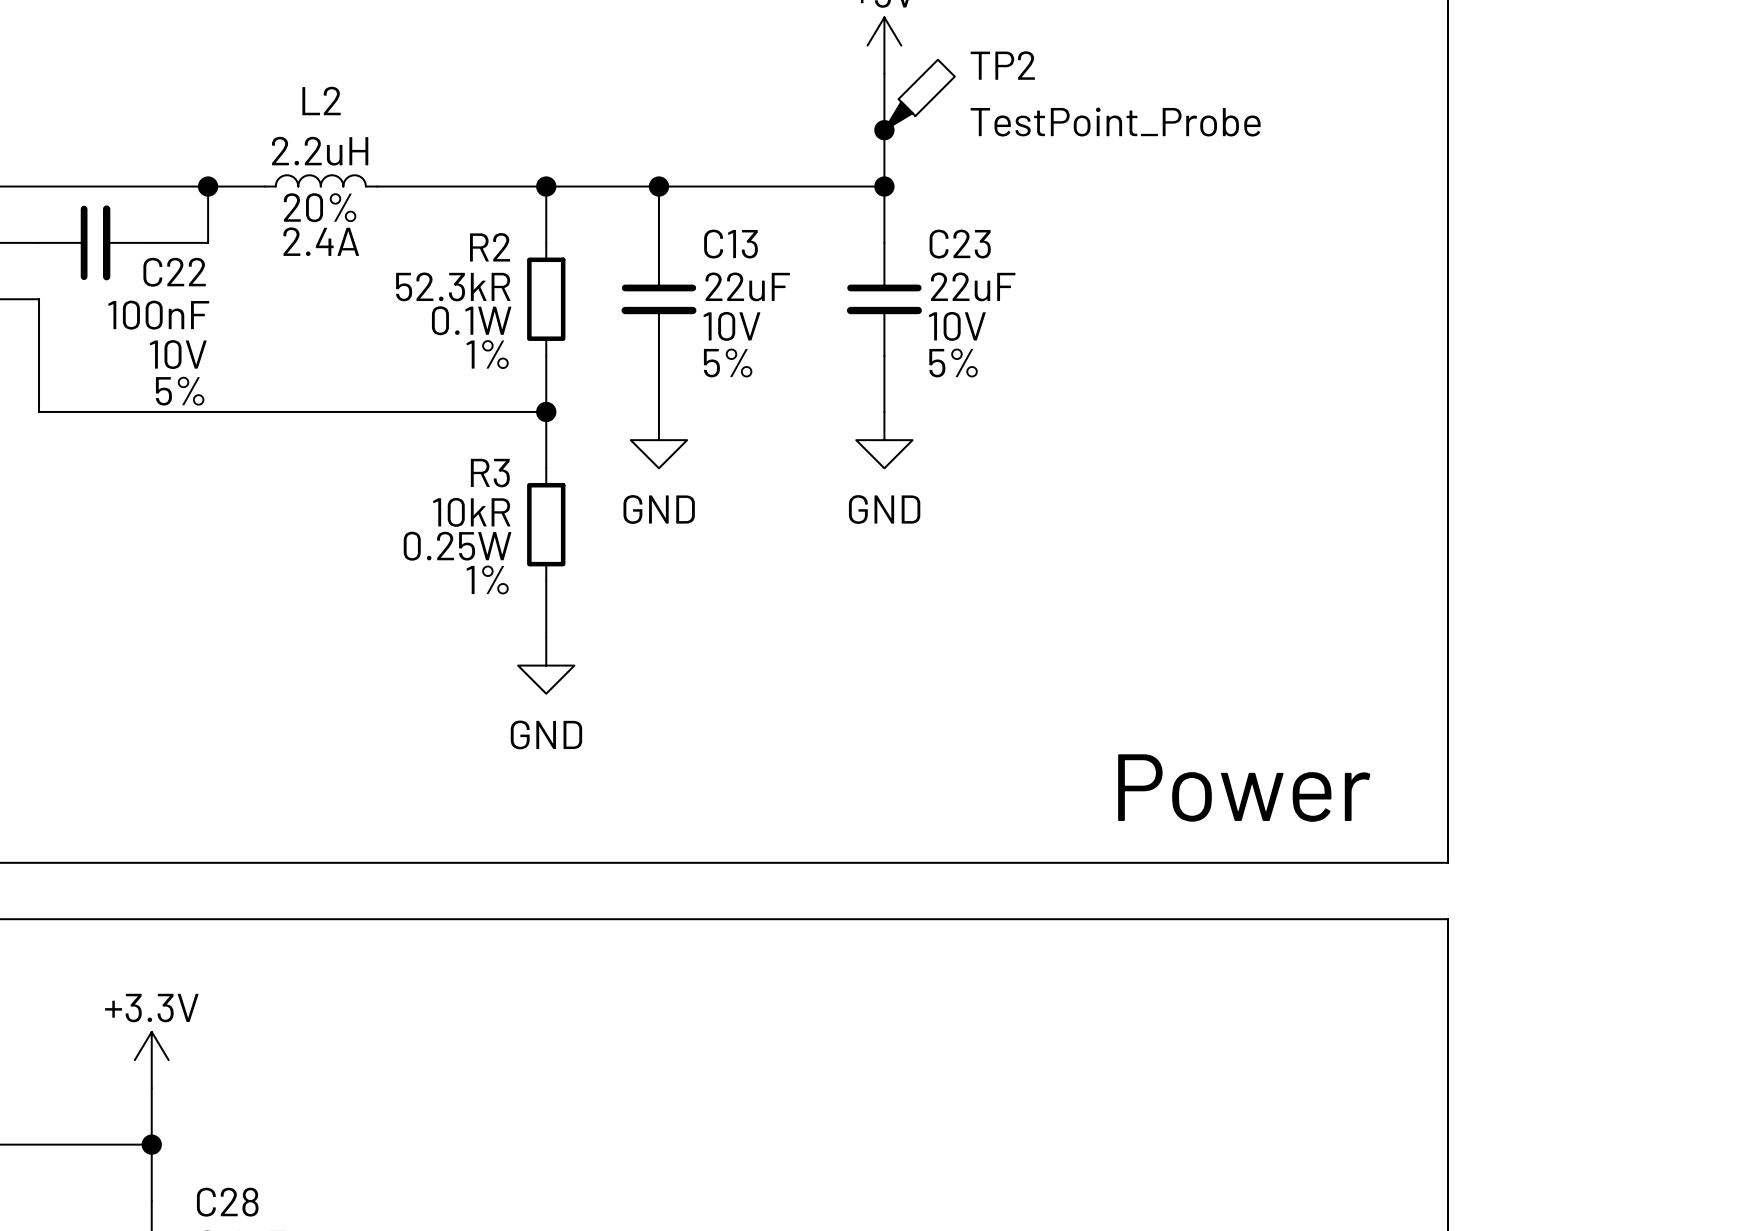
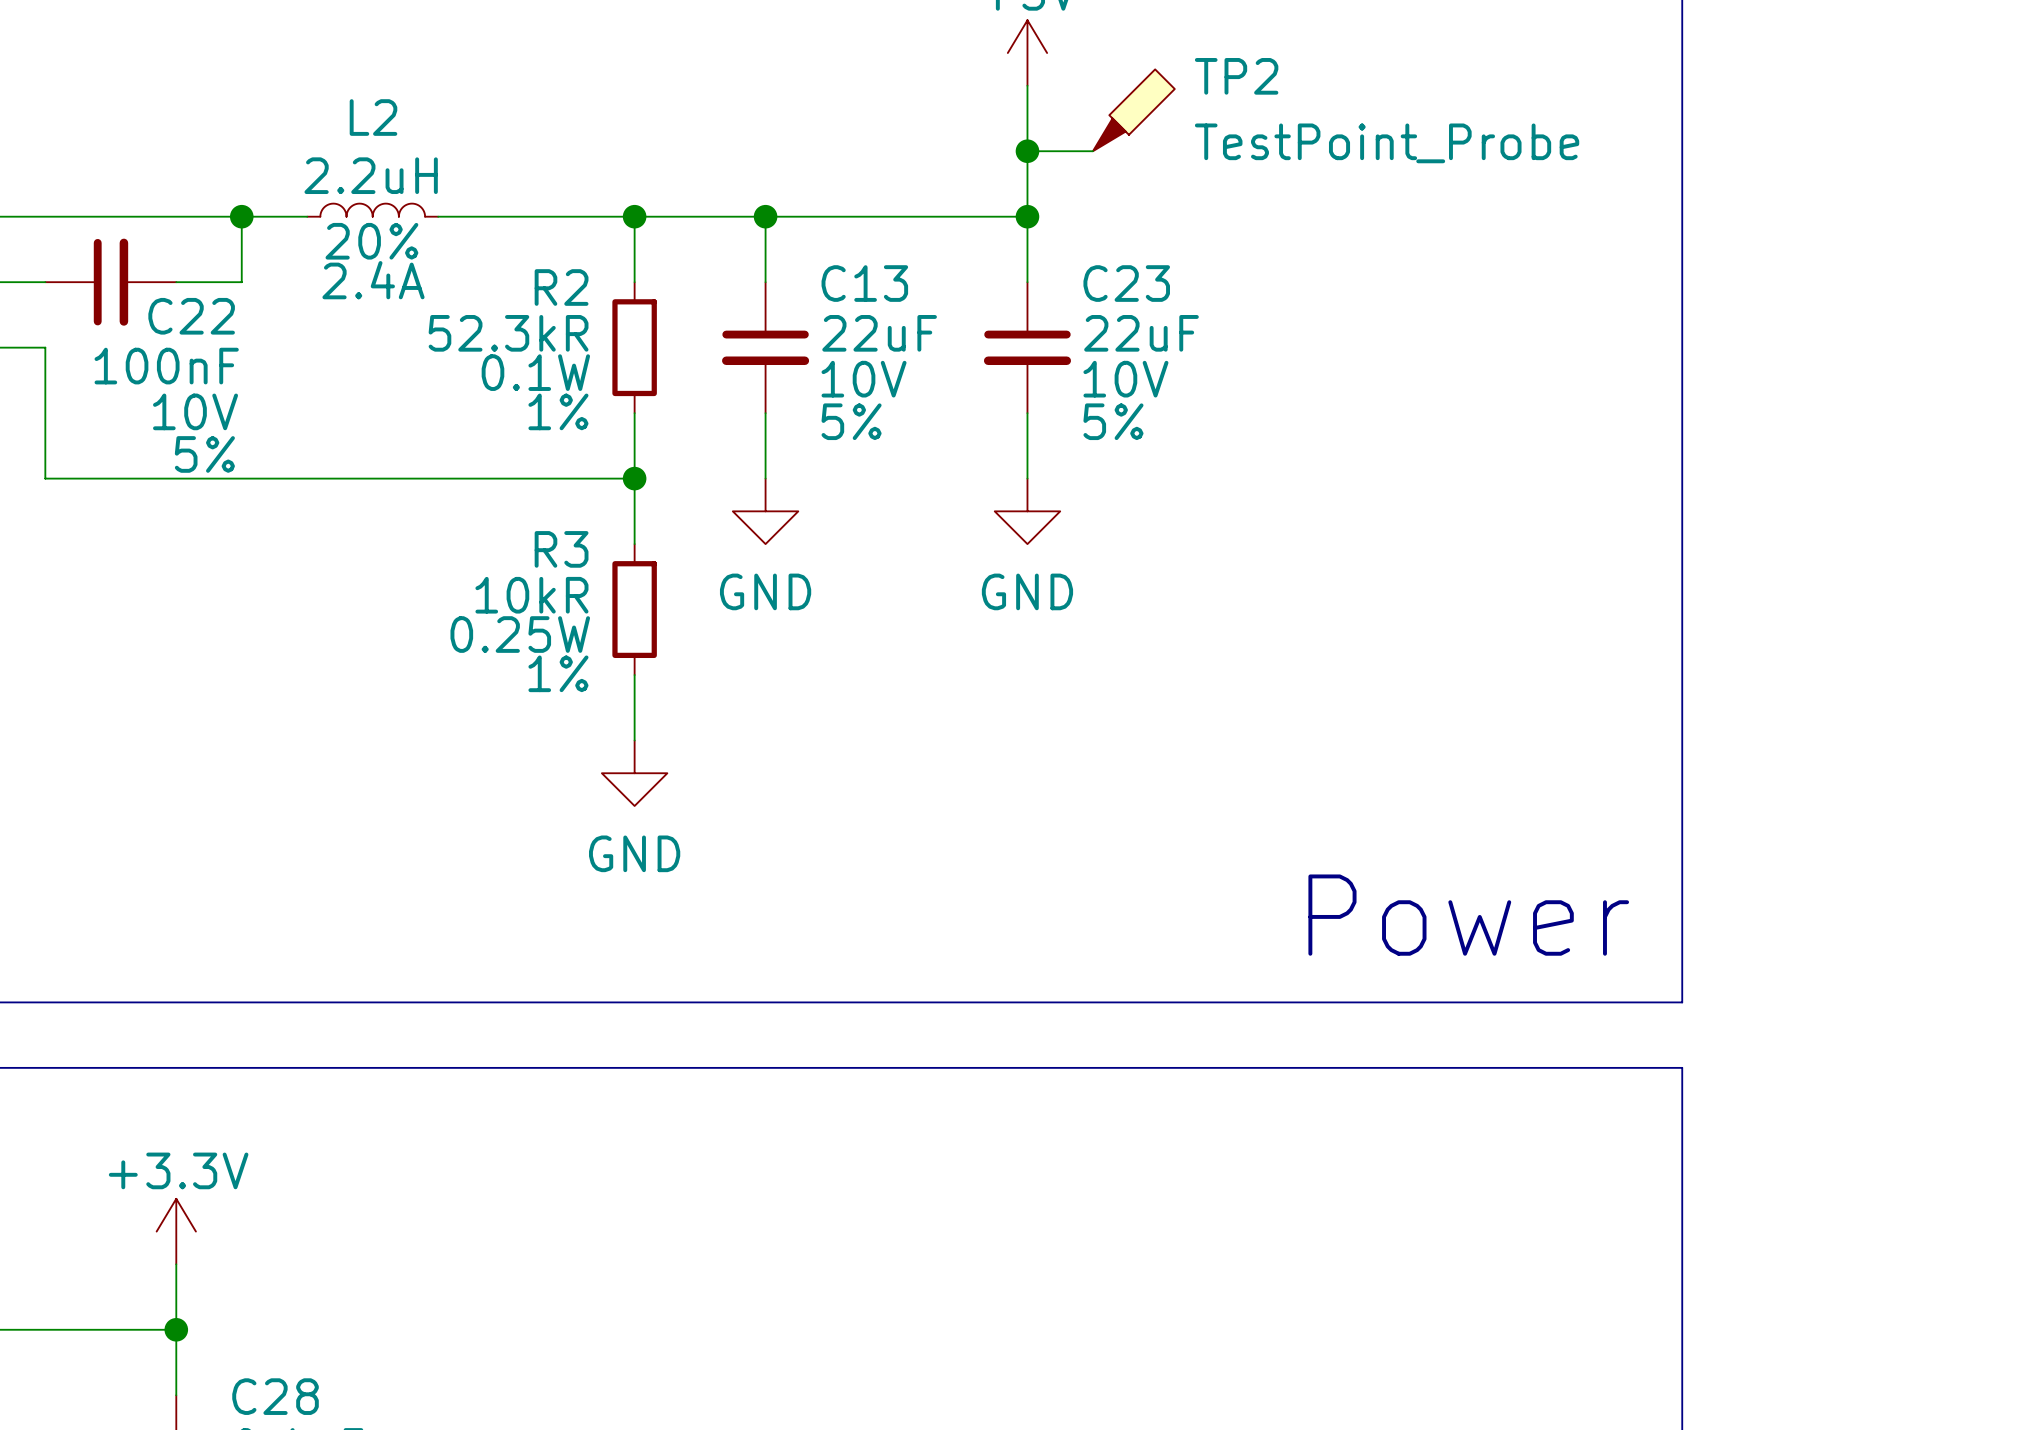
TP2 position: (919, 94) -> (1133, 110)
wire: none -> (1027, 151) (1092, 151)

